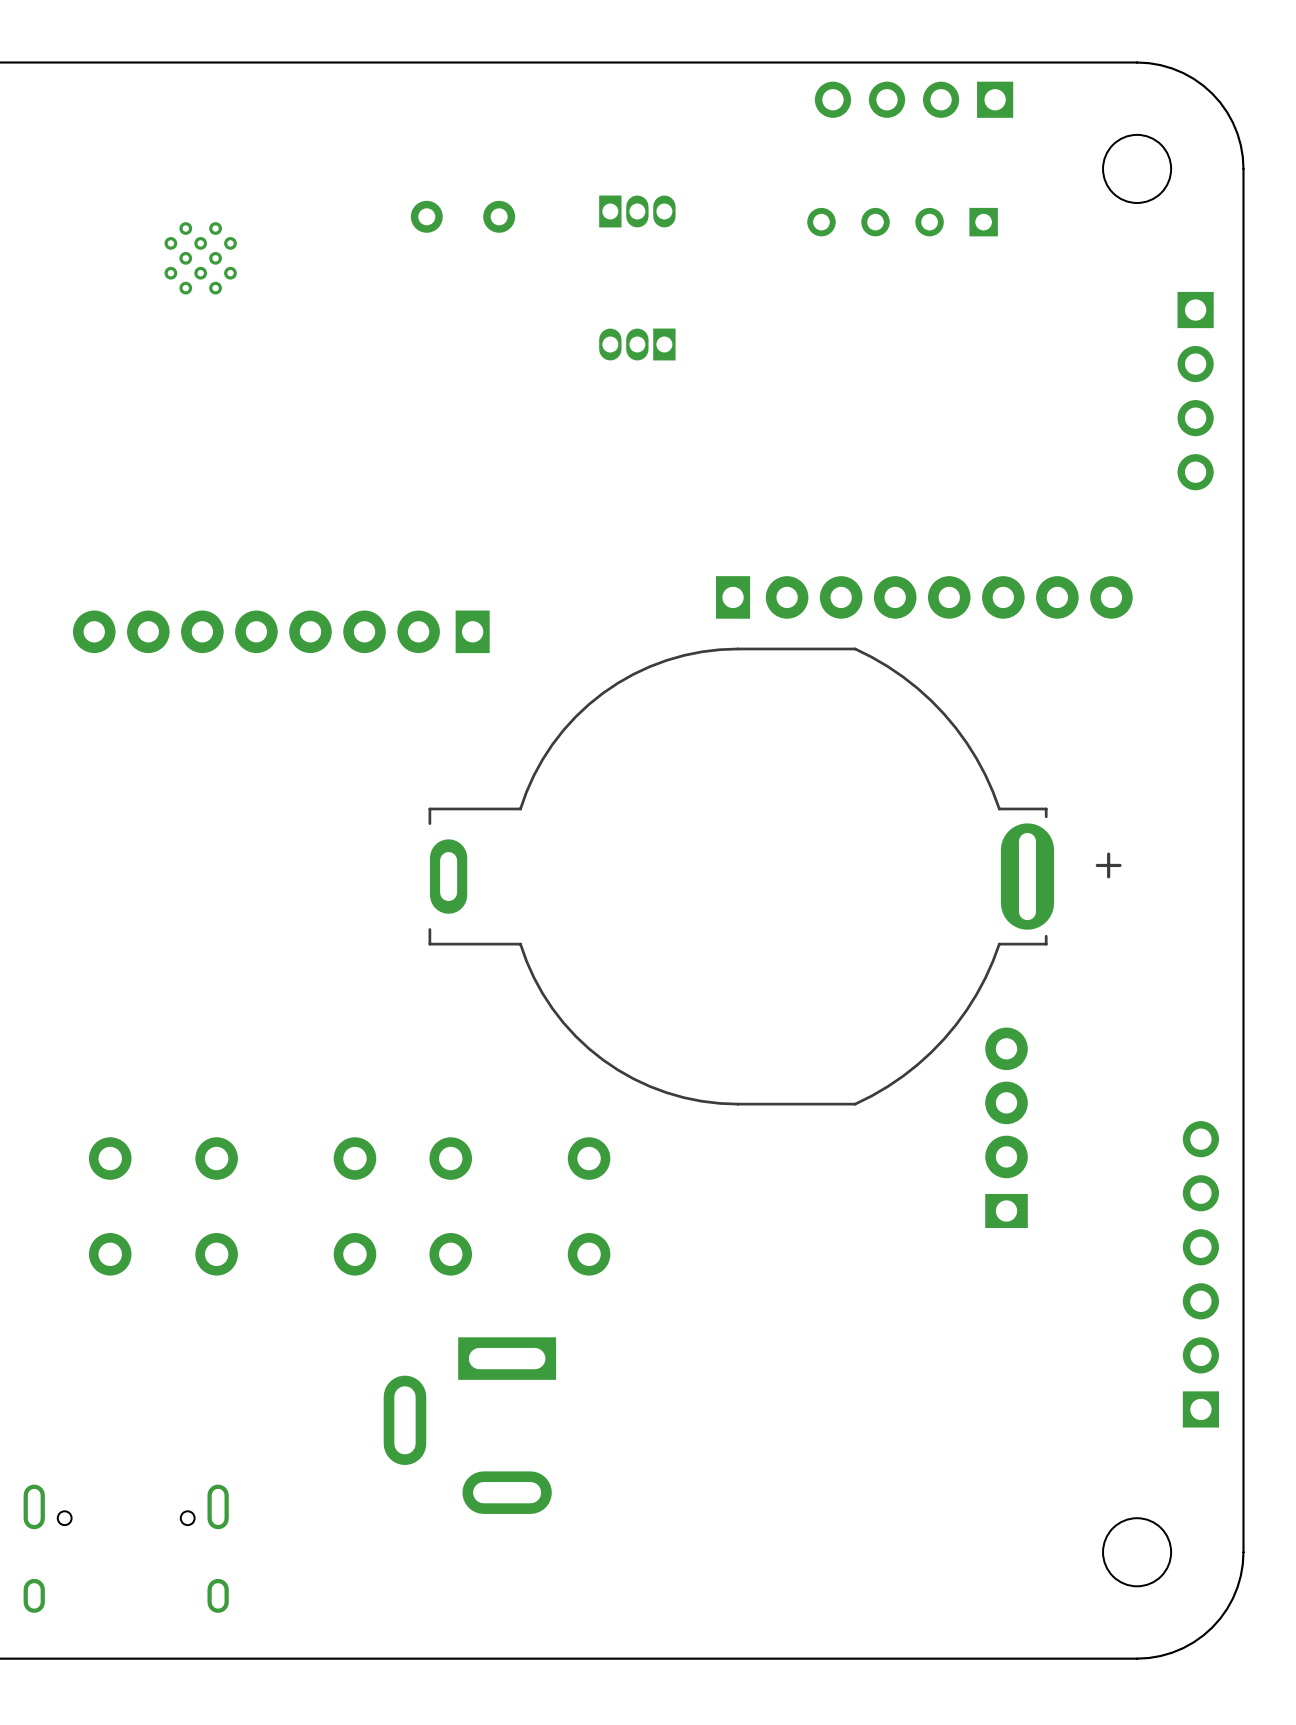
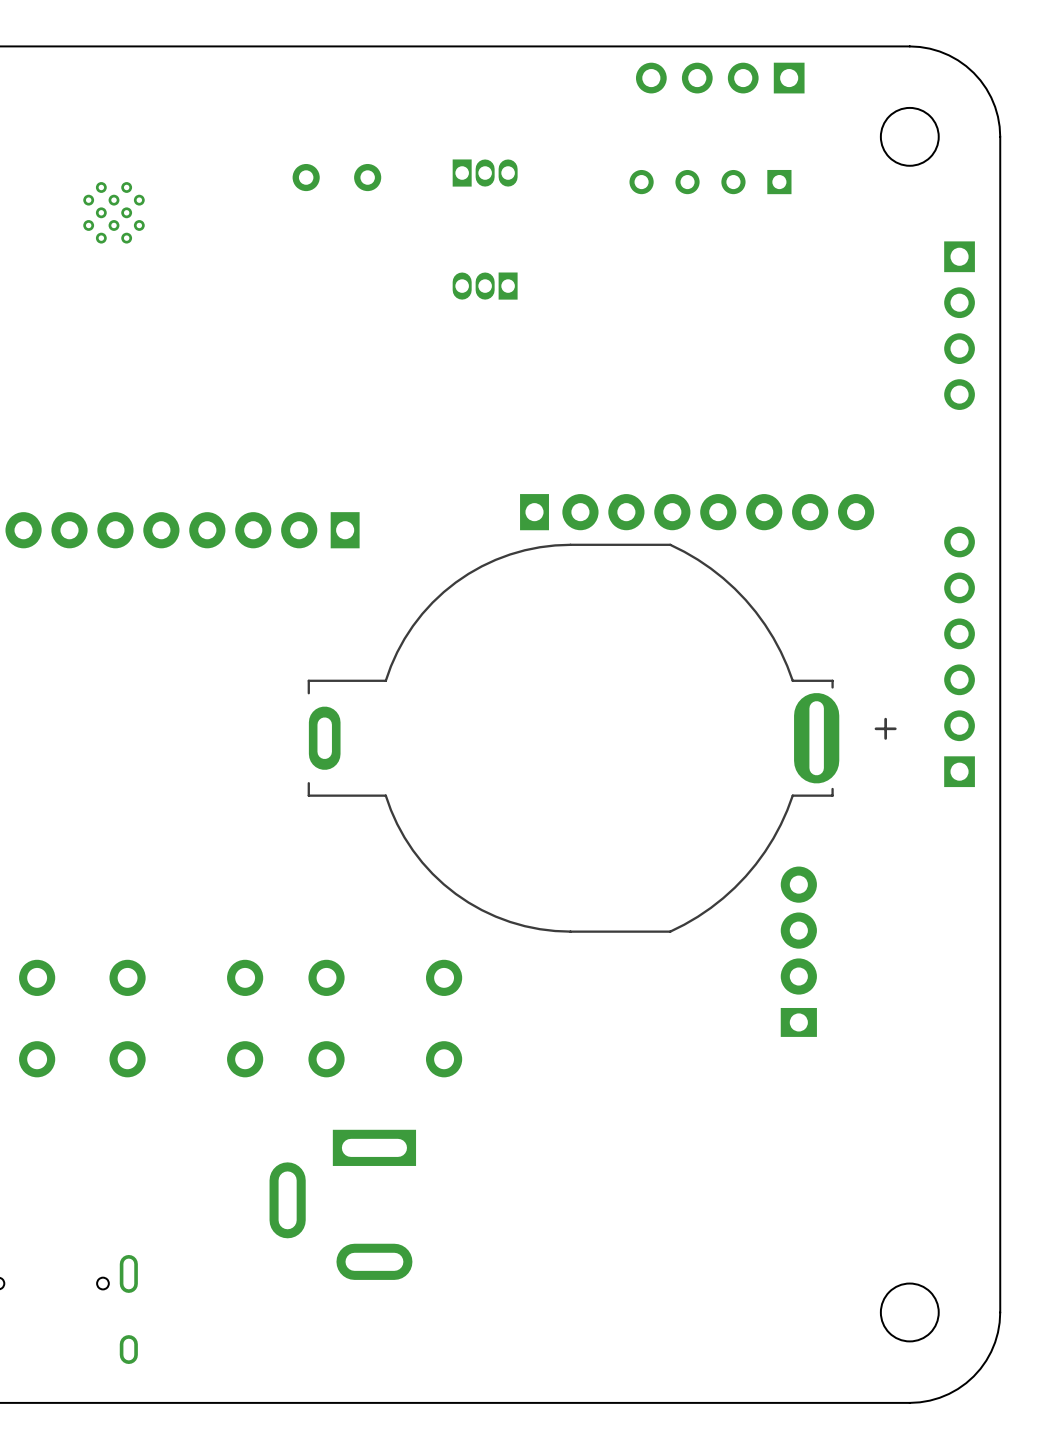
part position: (924, 597) -> (697, 512)
part position: (1200, 1274) -> (959, 656)

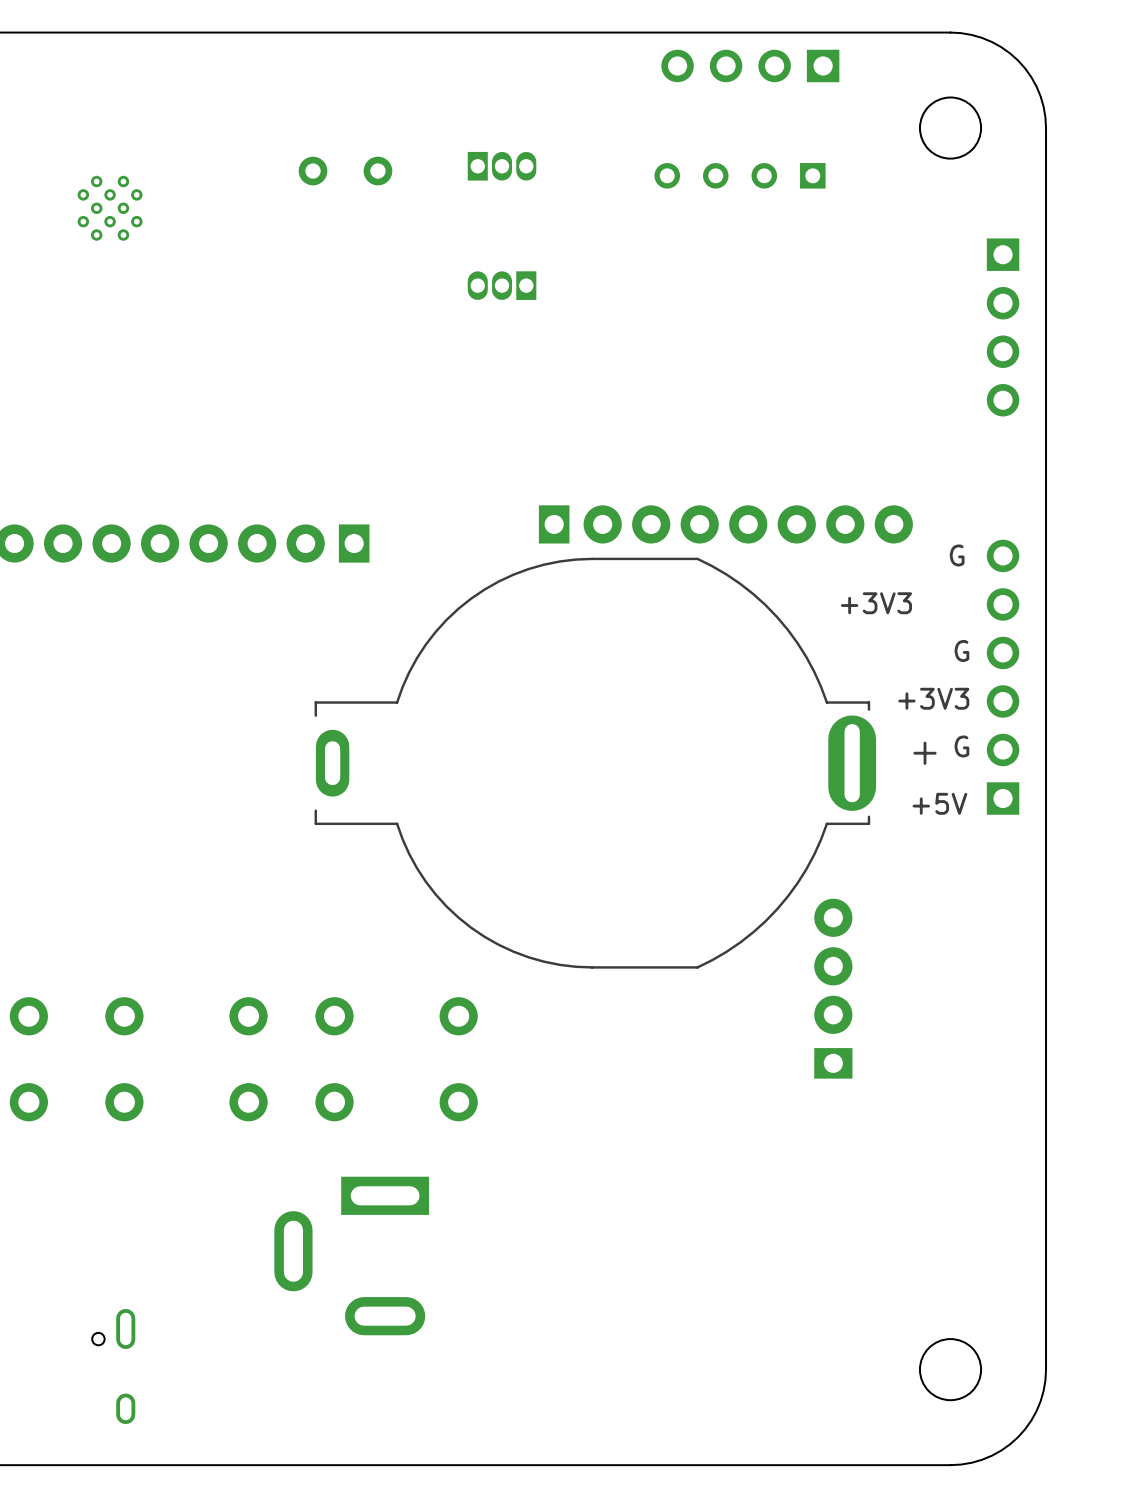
text: none -> G (957, 555)
text: none -> +3V3 (876, 603)
text: none -> G (961, 651)
text: none -> +3V3 (933, 698)
text: none -> G (961, 746)
text: none -> +5V (939, 803)

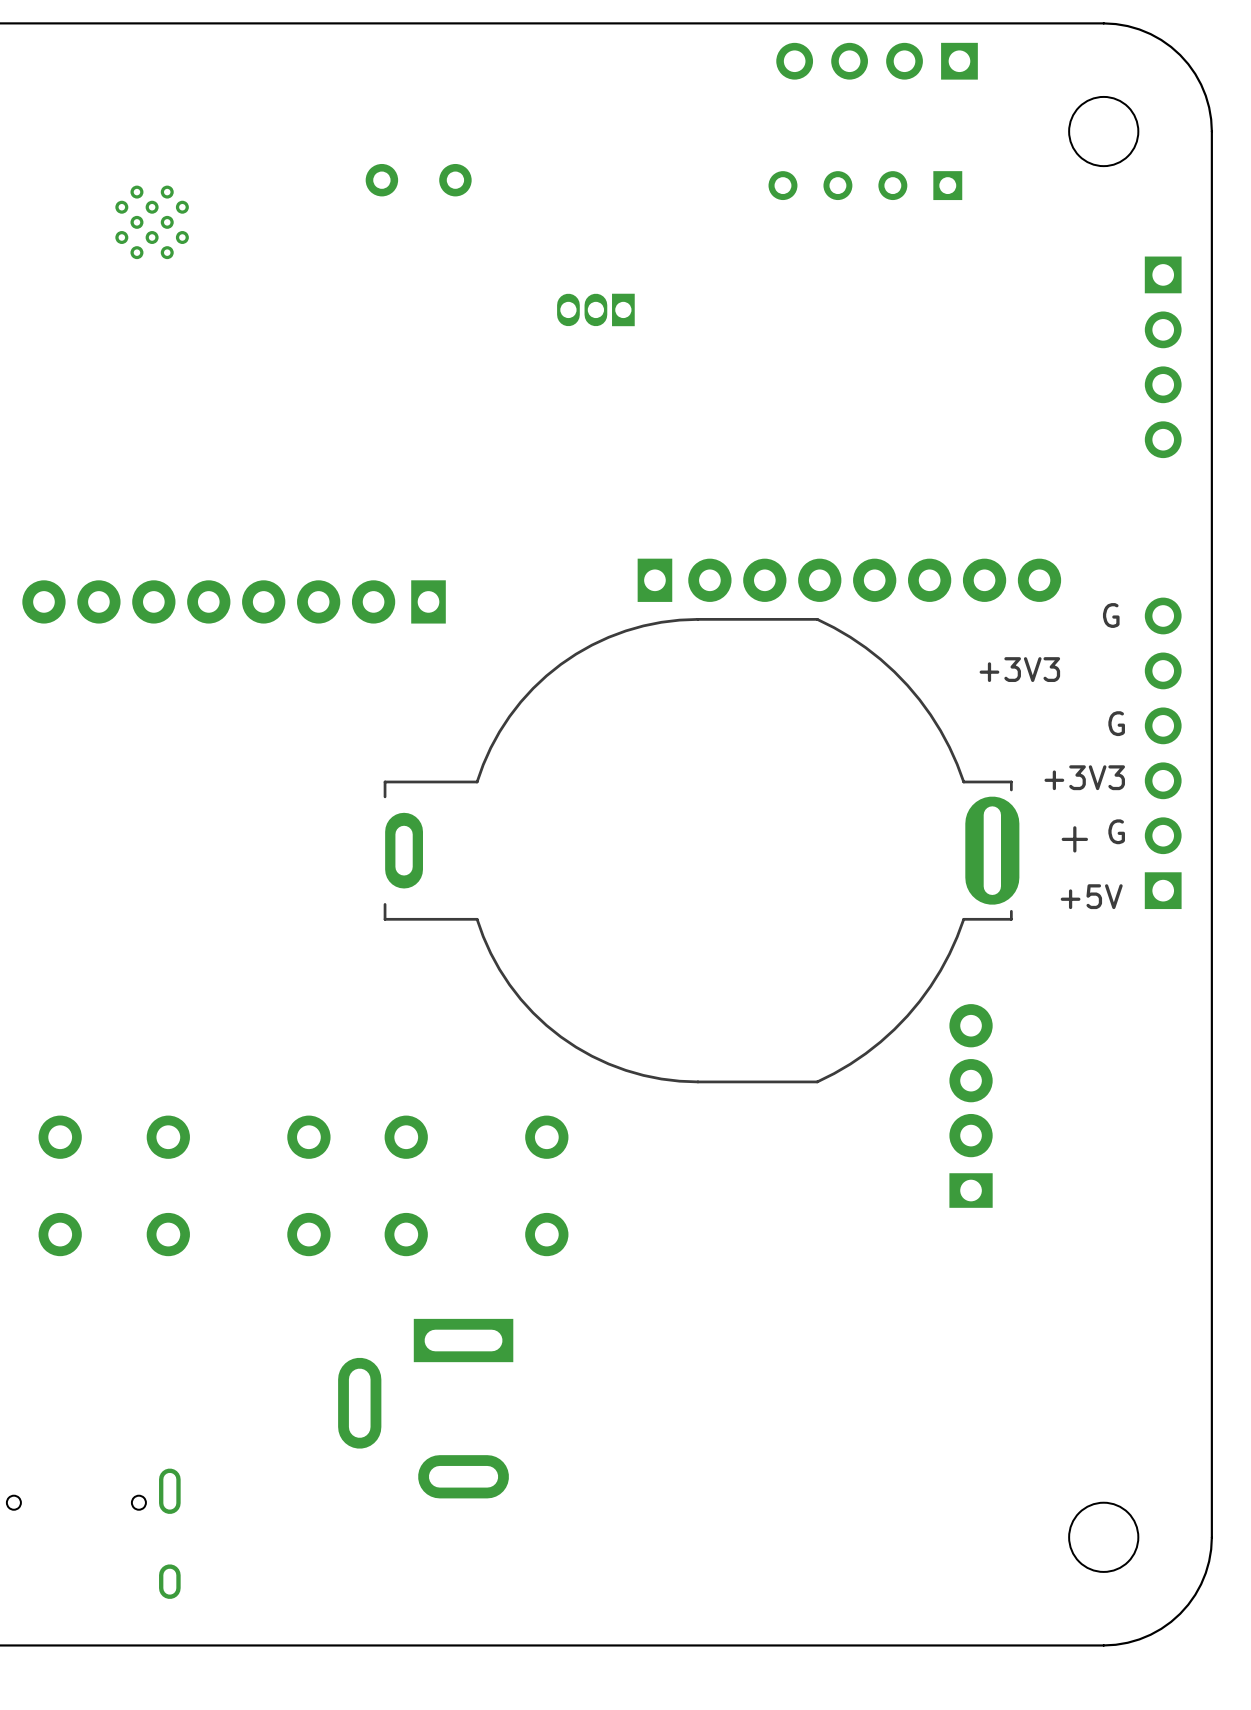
part: (502, 166) -> none

